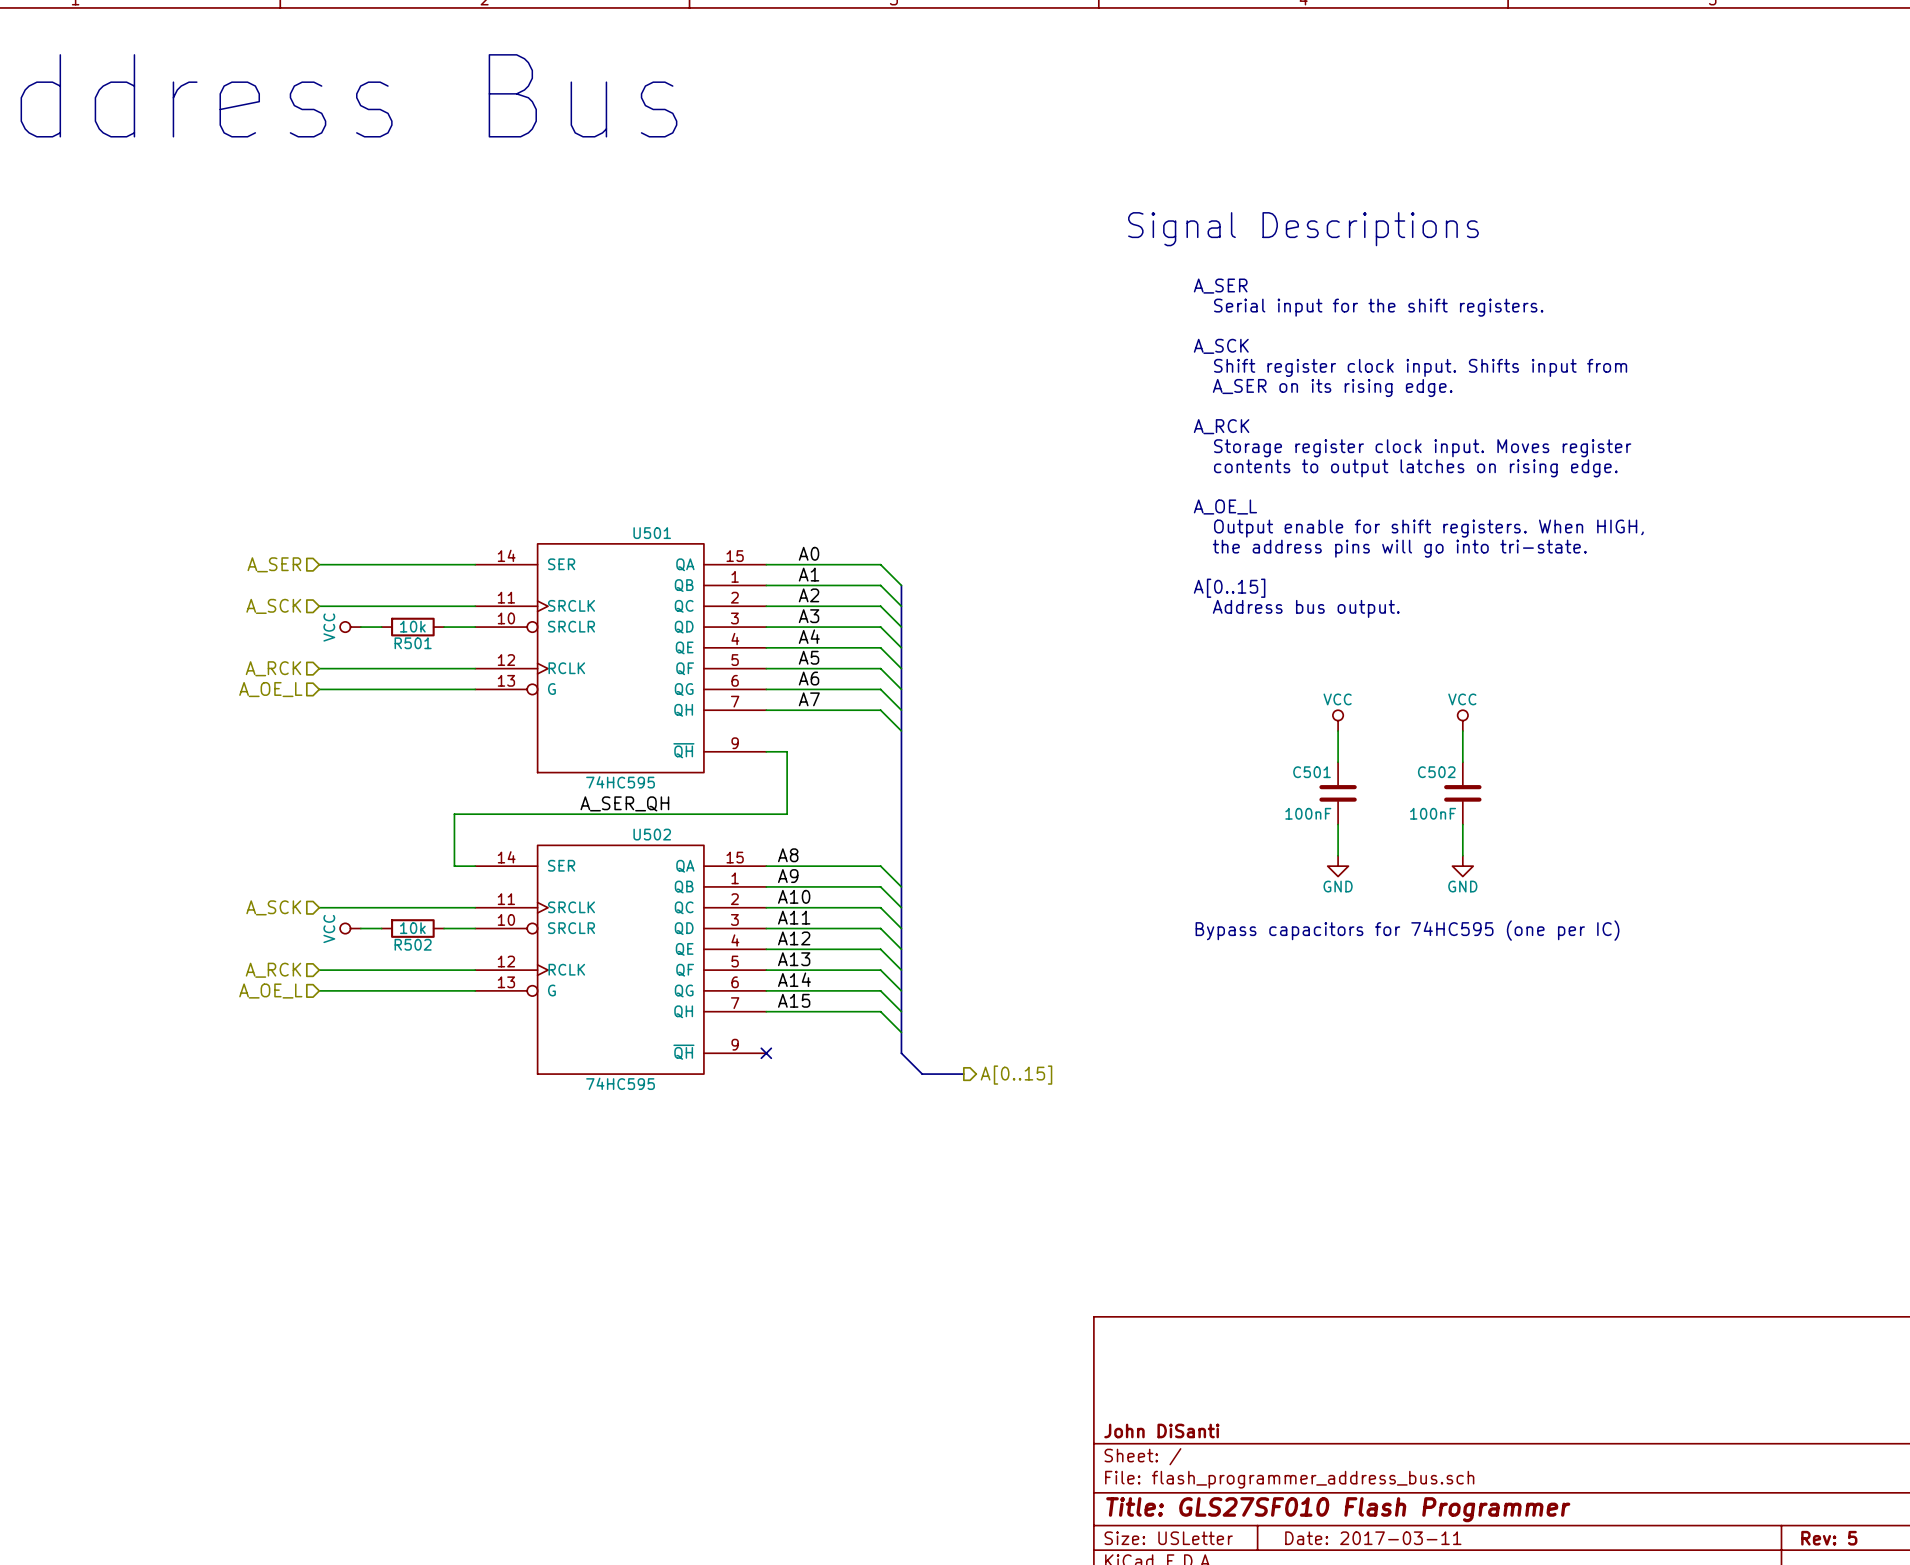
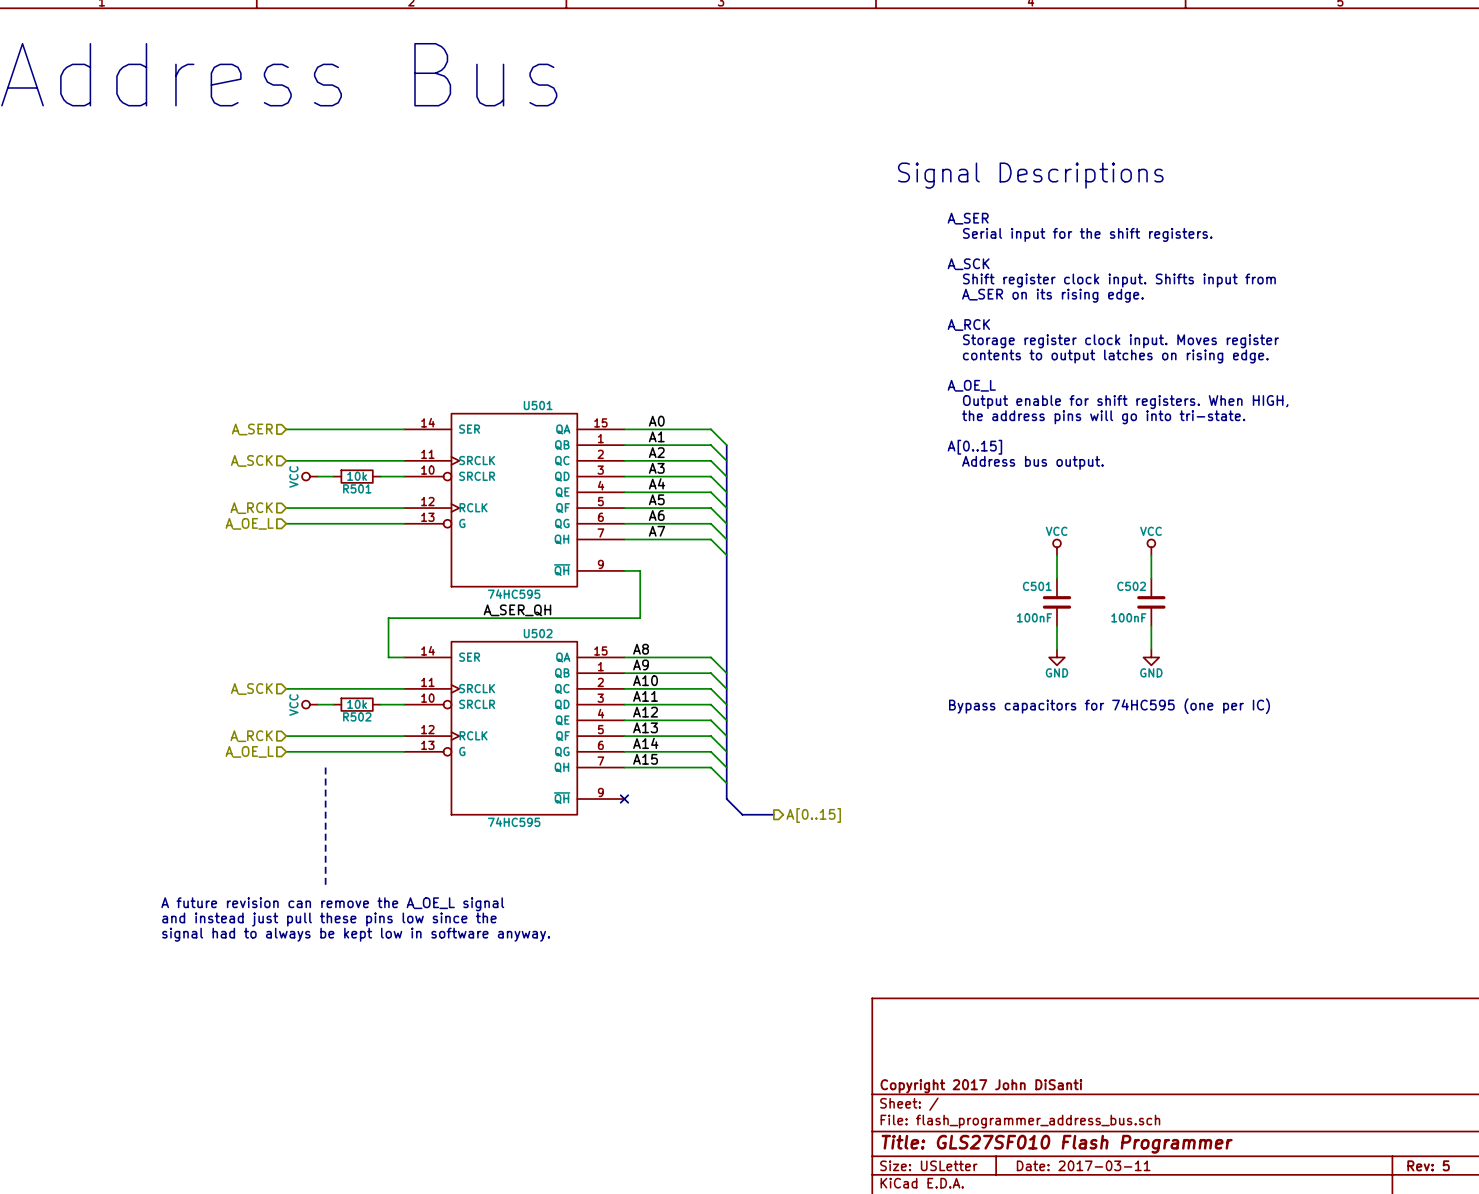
line: none -> (325, 767) (325, 885)
text: none -> A future revision can remove the A_OE_L signal (332, 904)
text: none -> and instead just pull these pins low since the (329, 919)
text: none -> signal had to always be kept low in software anyway. (356, 934)
title block: John DiSanti (1161, 1430) -> Copyright 2017 John DiSanti (981, 1086)

